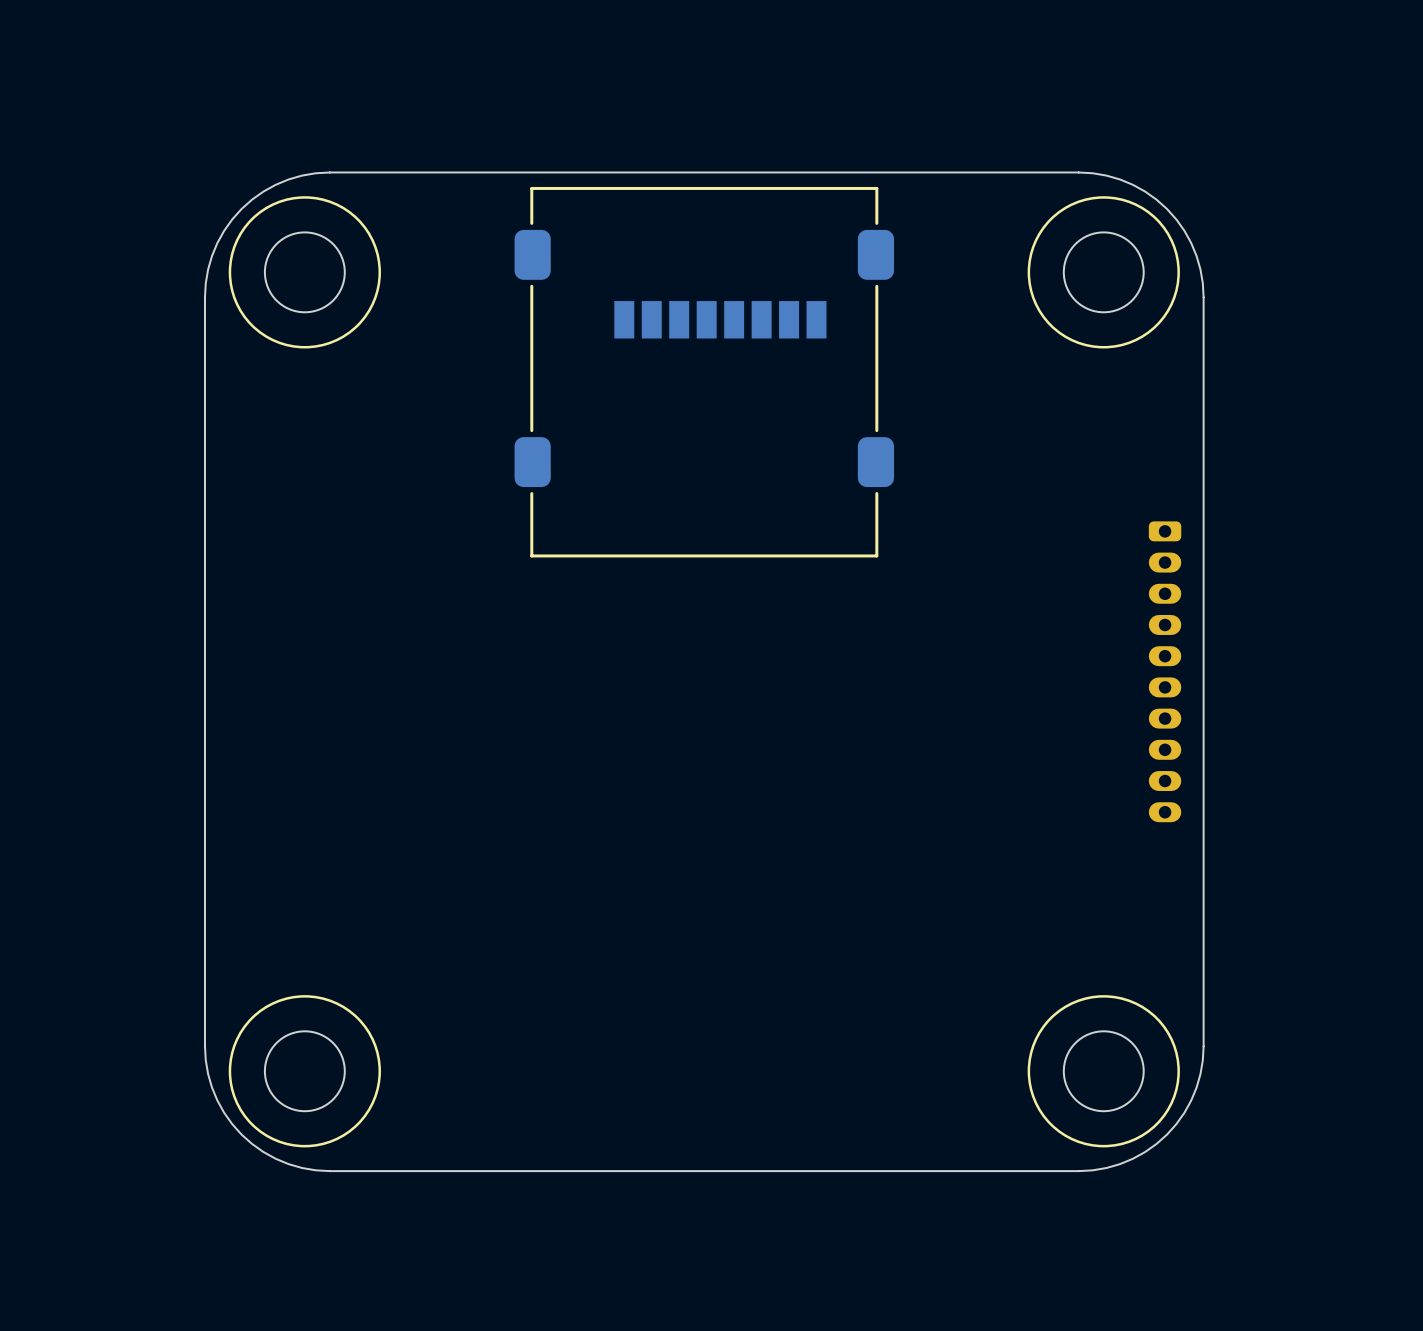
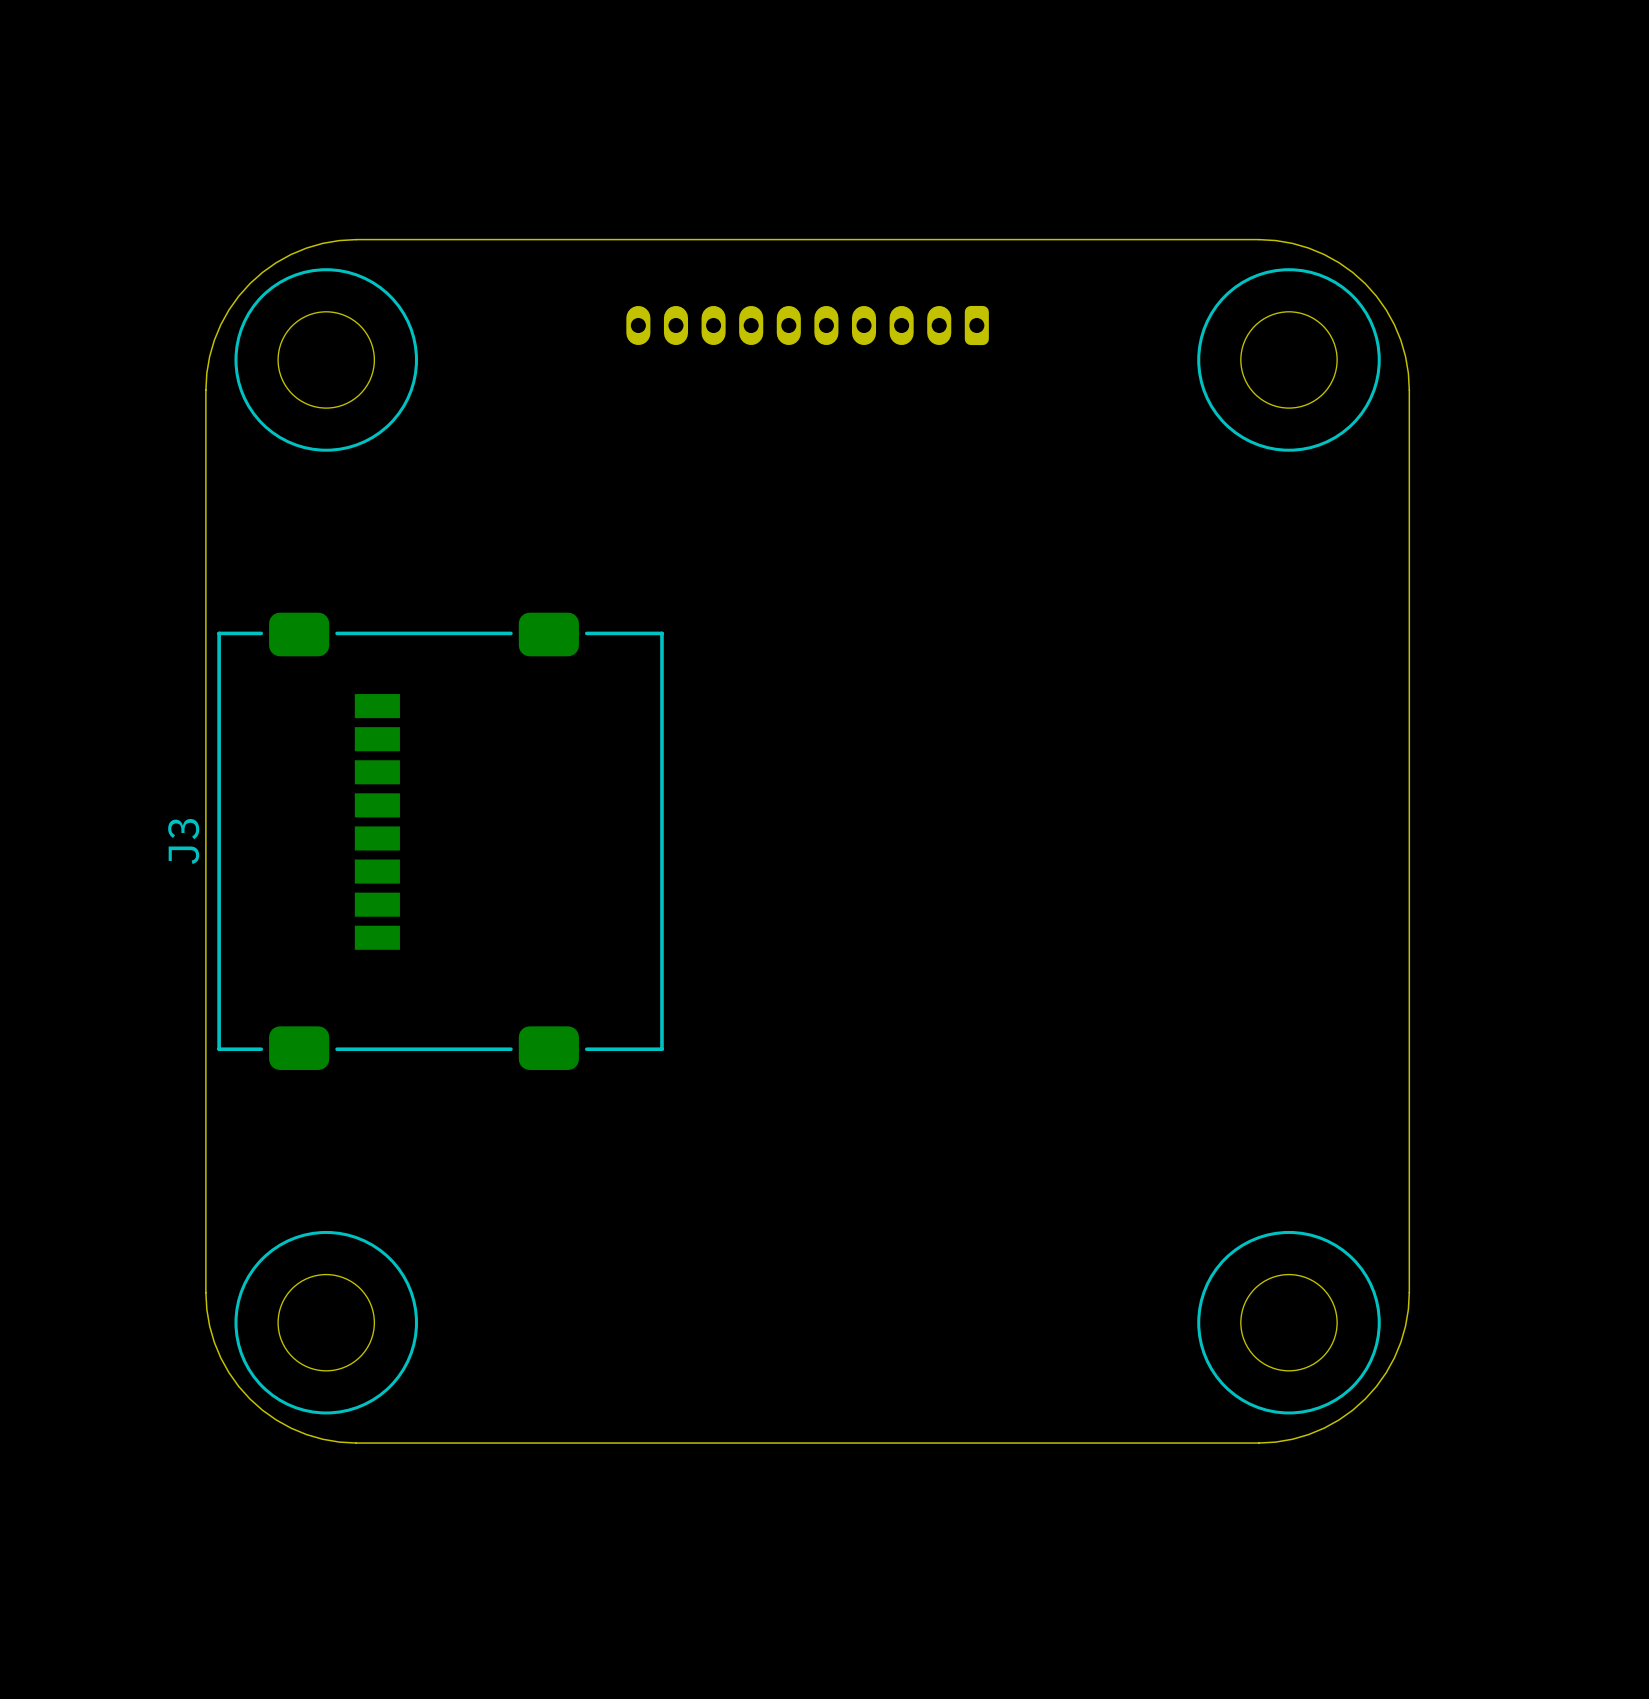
part: none -> (807, 325)
part: (704, 372) -> none
J3: none -> (440, 841)
part: (1165, 671) -> none

